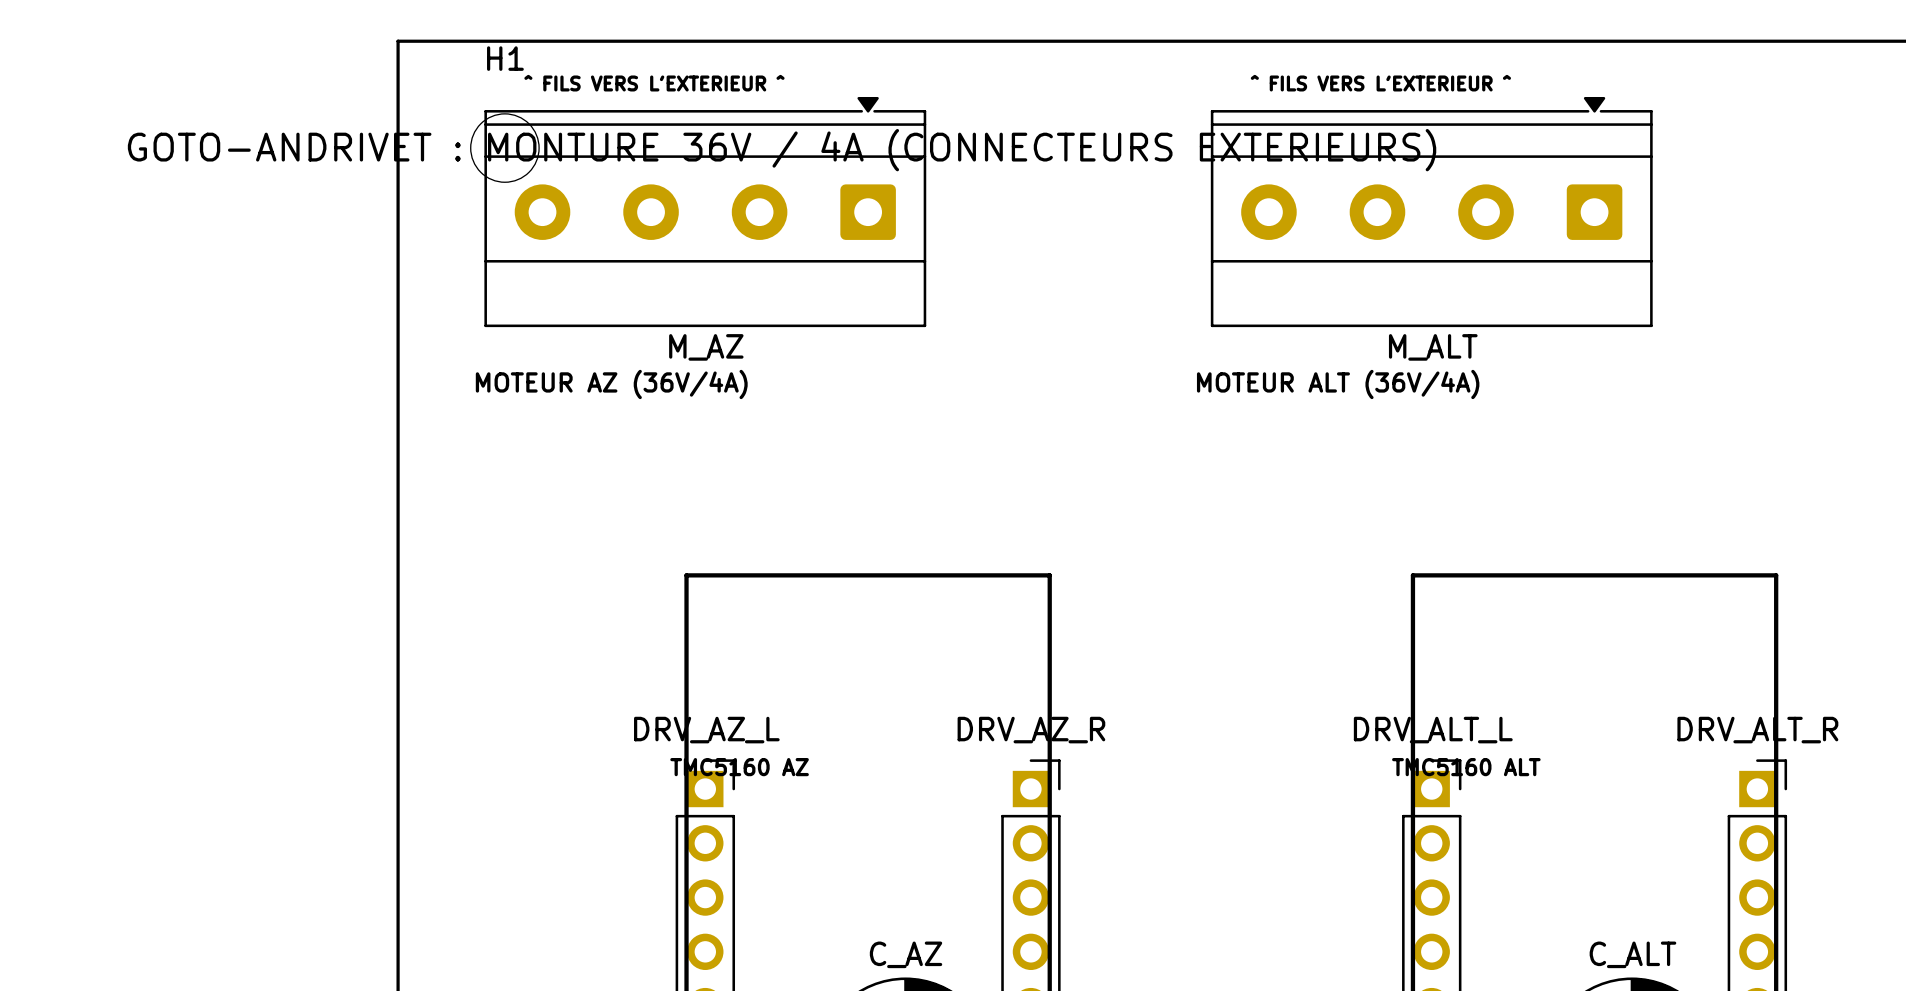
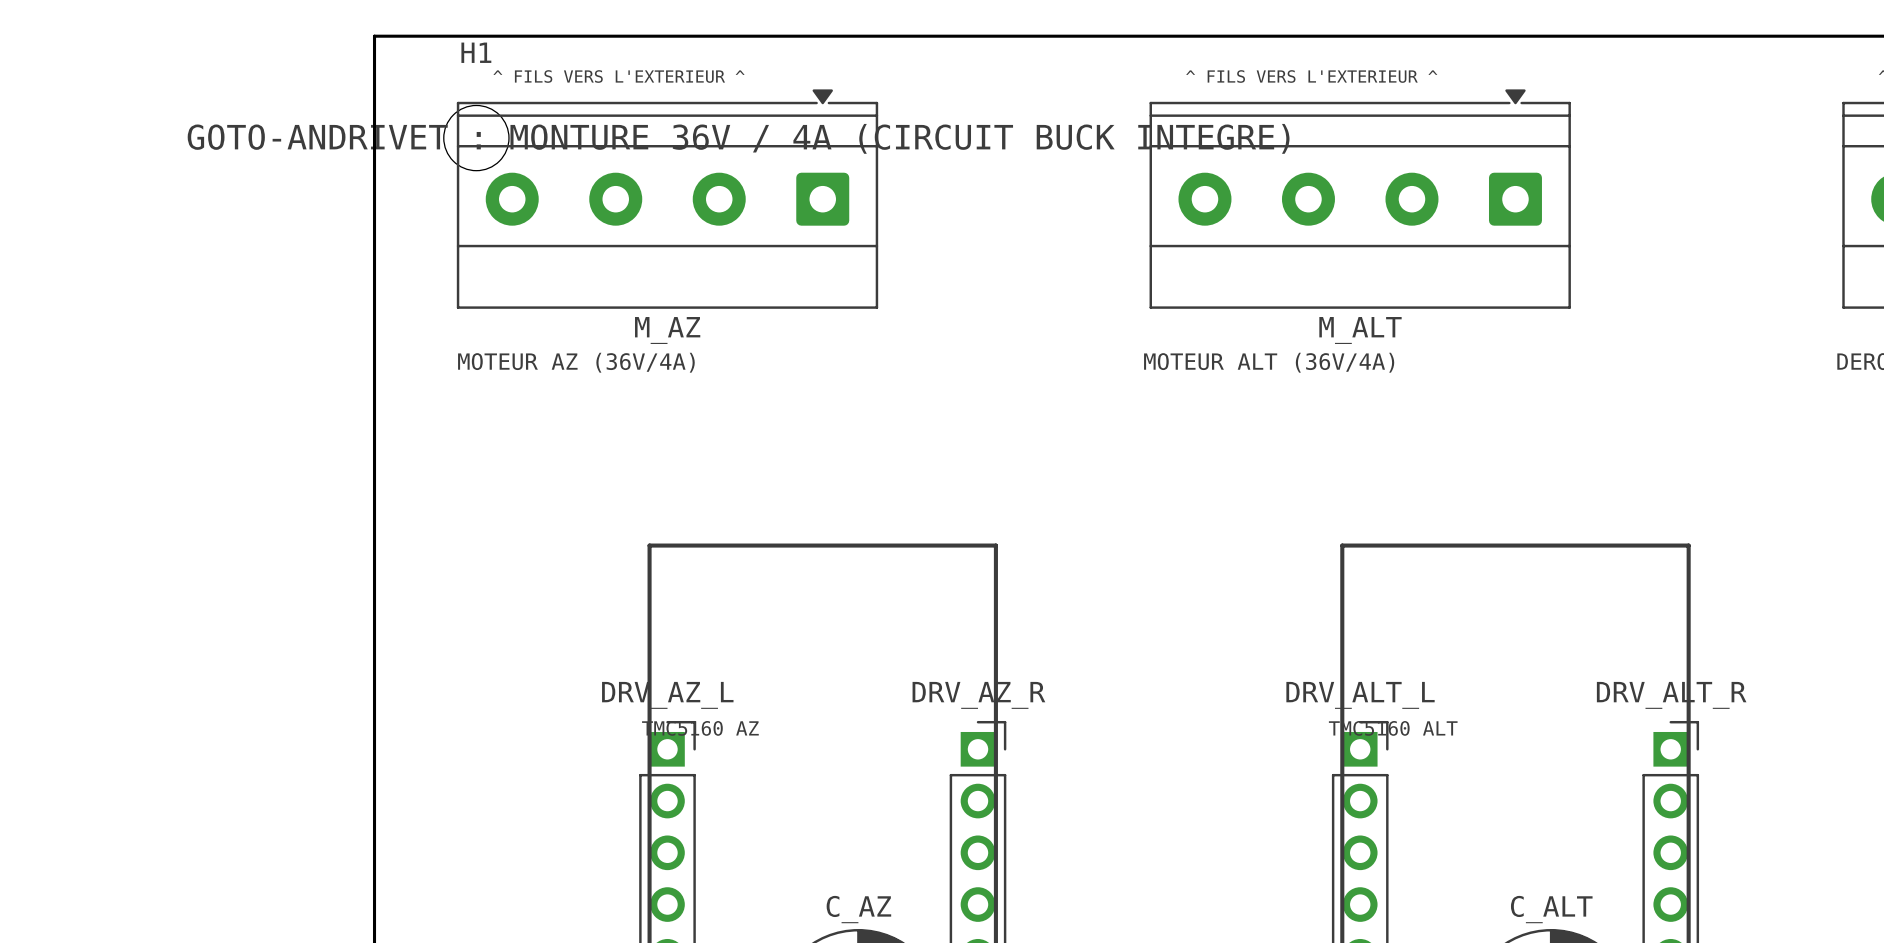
text: GOTO-ANDRIVET : MONTURE 36V / 4A (CONNECTEURS EXTERIEURS) (782, 150) -> GOTO-ANDRIVET : MONTURE 36V / 4A (CIRCUIT BUCK INTEGRE) (738, 138)

